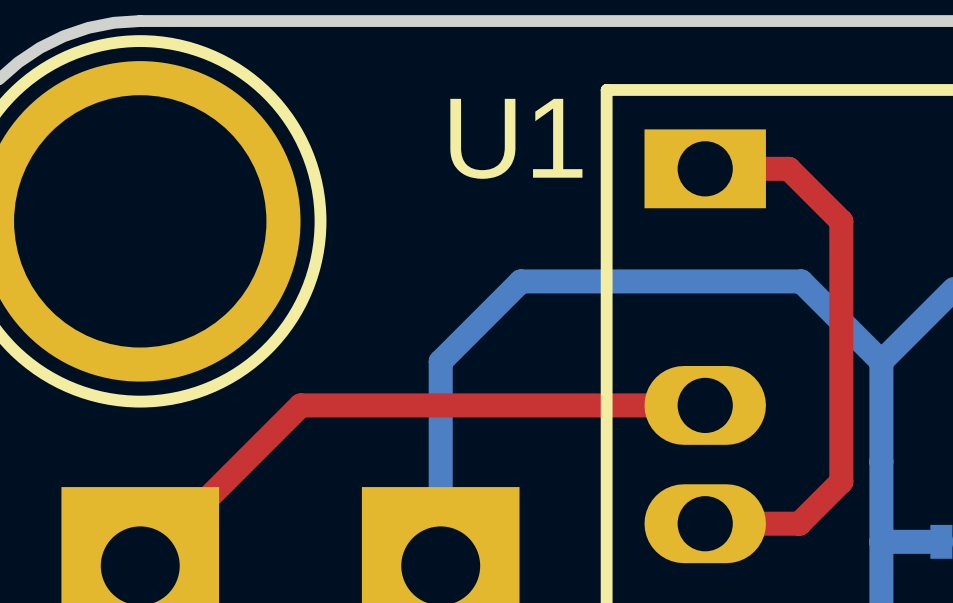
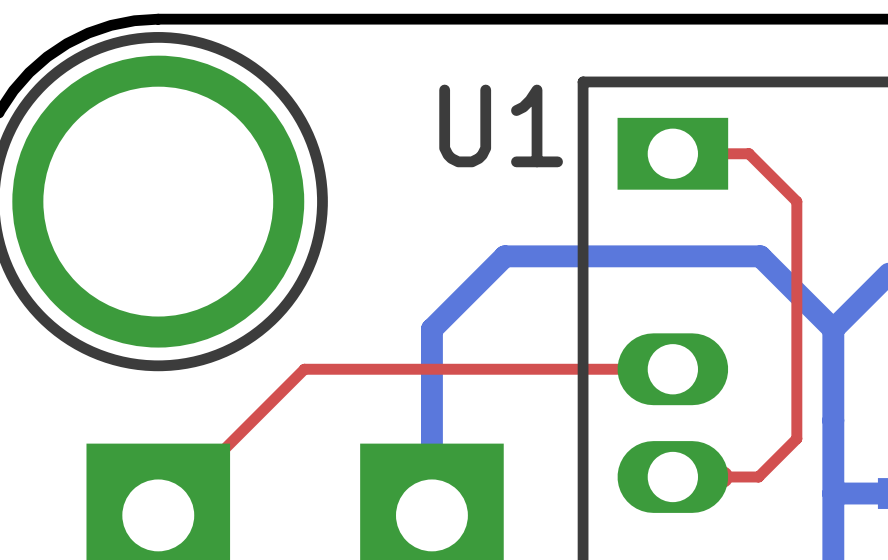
top track width: thick (705, 168) (788, 168) (841, 221) (841, 481) (799, 523) (759, 523) -> thin (672, 153) (748, 153) (796, 201) (796, 438) (758, 477) (722, 477)
top track width: thick (705, 405) (300, 405) (140, 565) -> thin (672, 369) (304, 369) (158, 515)

